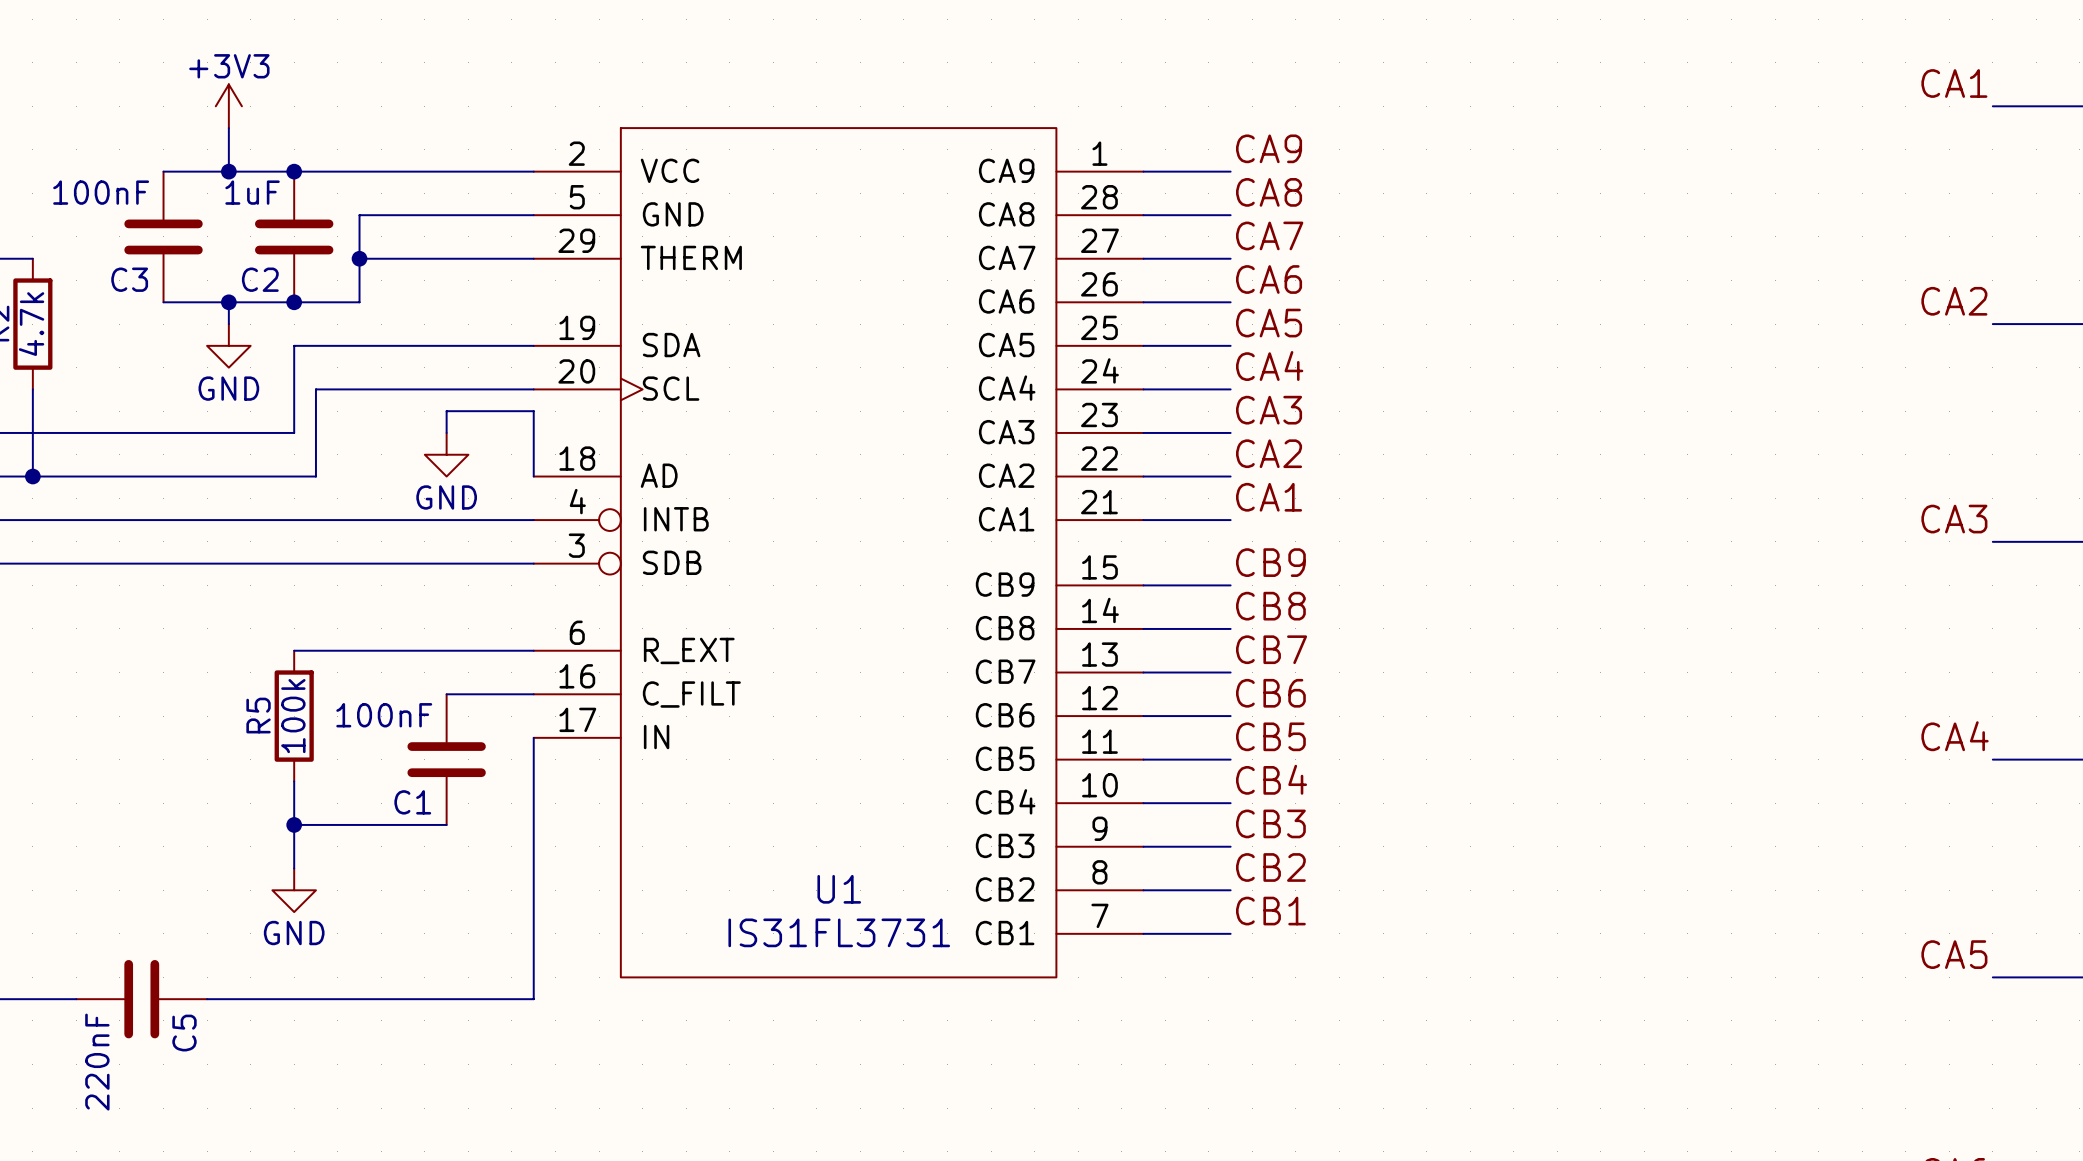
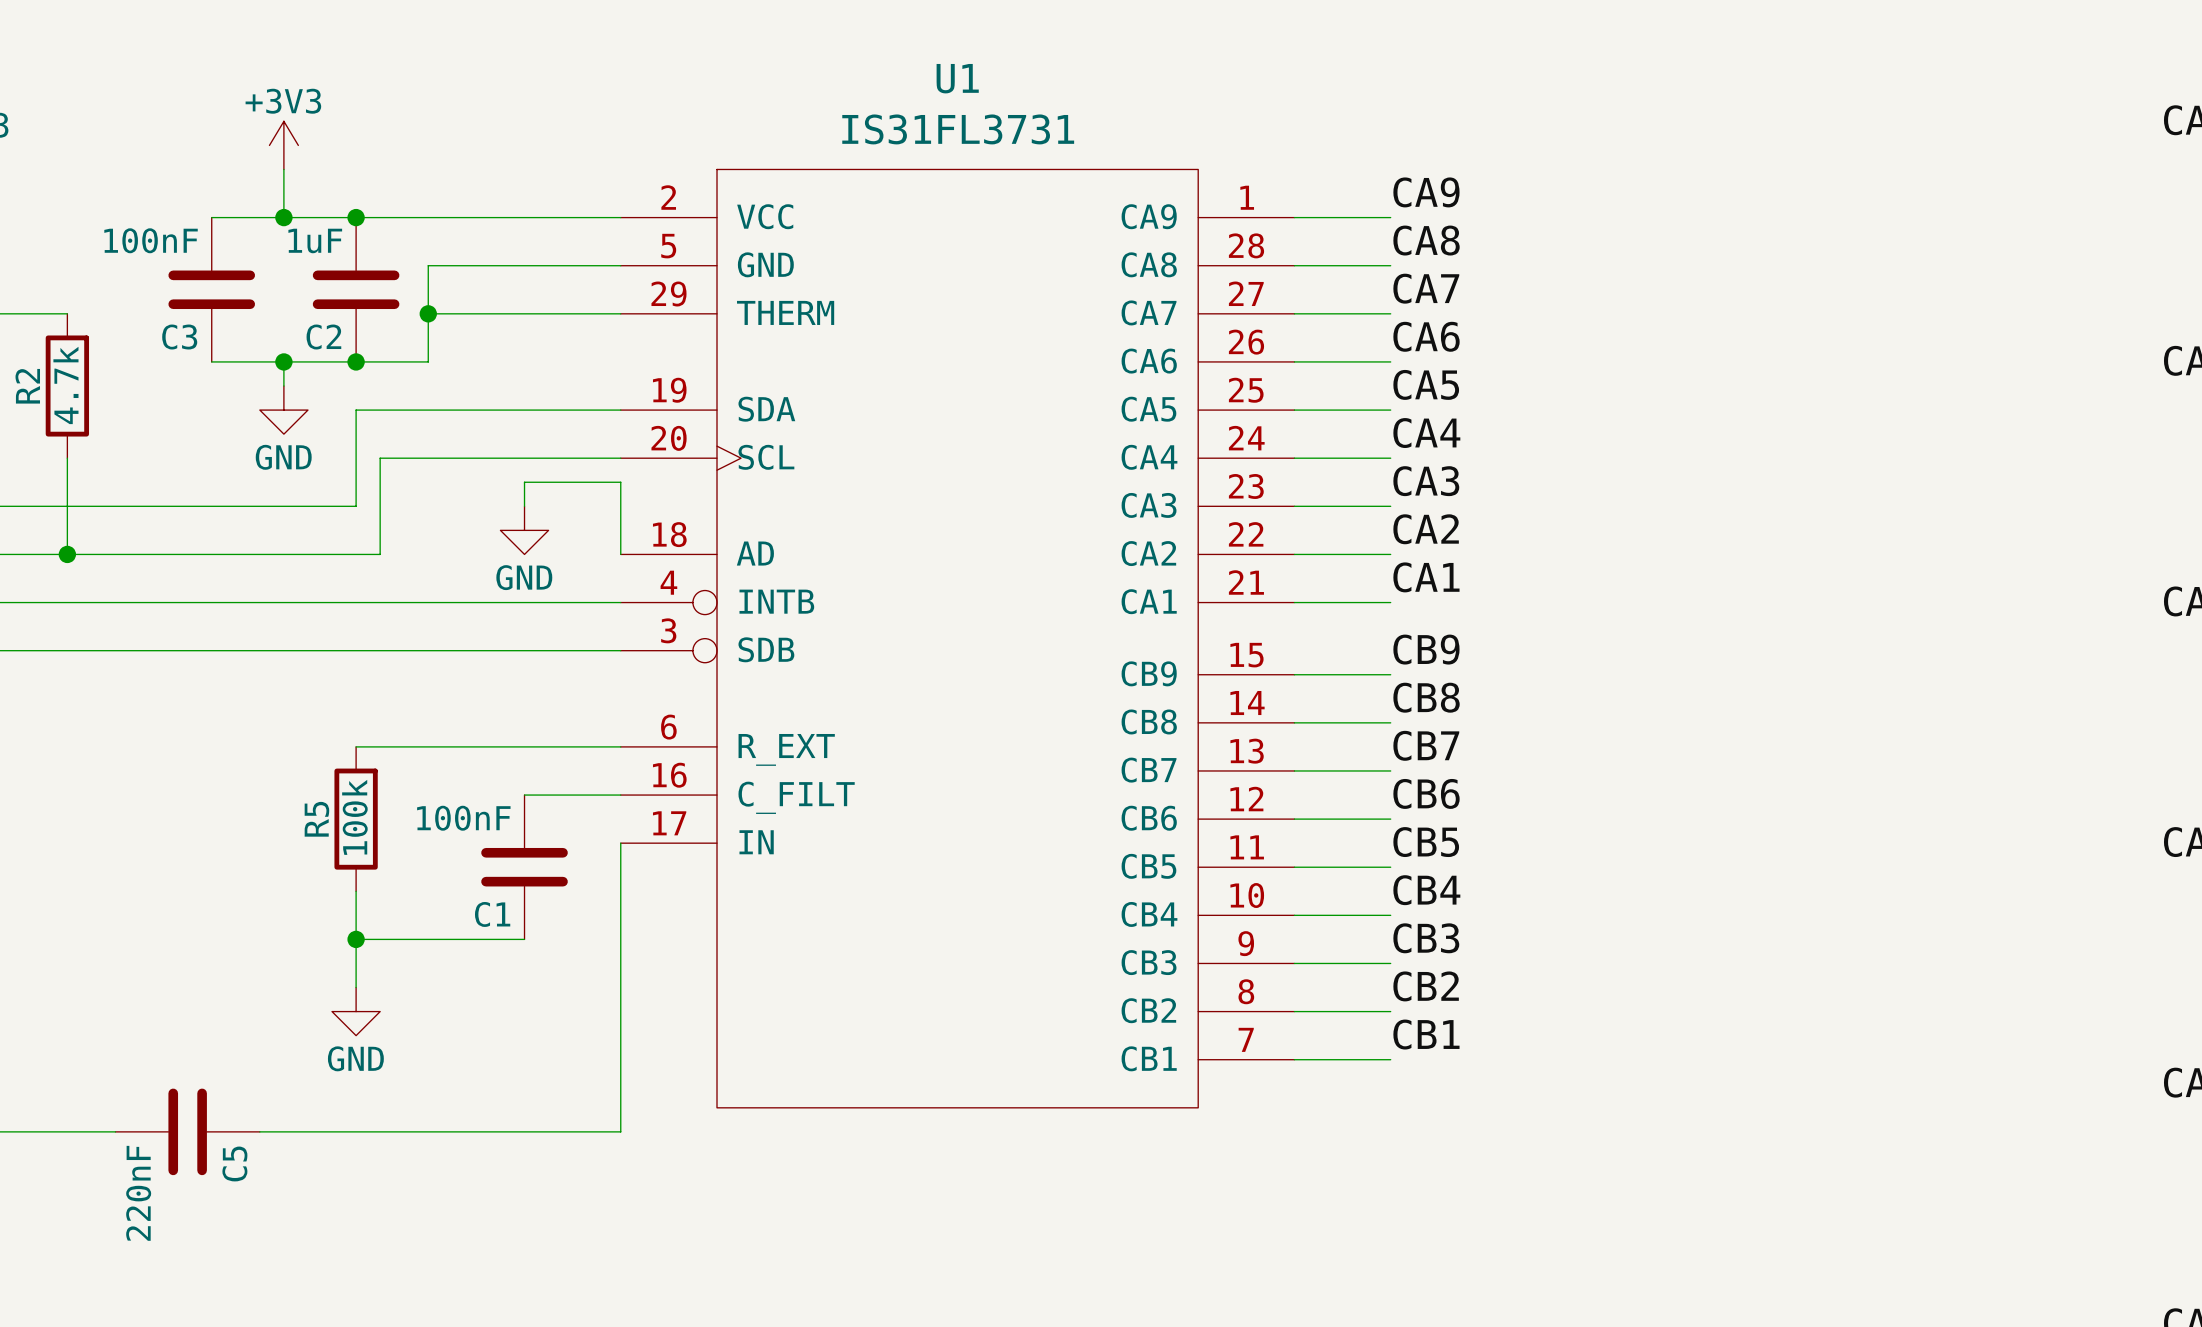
U1 name position: U1 (839, 889) -> U1 (957, 78)
U1 value position: IS31FL3731 (839, 932) -> IS31FL3731 (958, 129)

